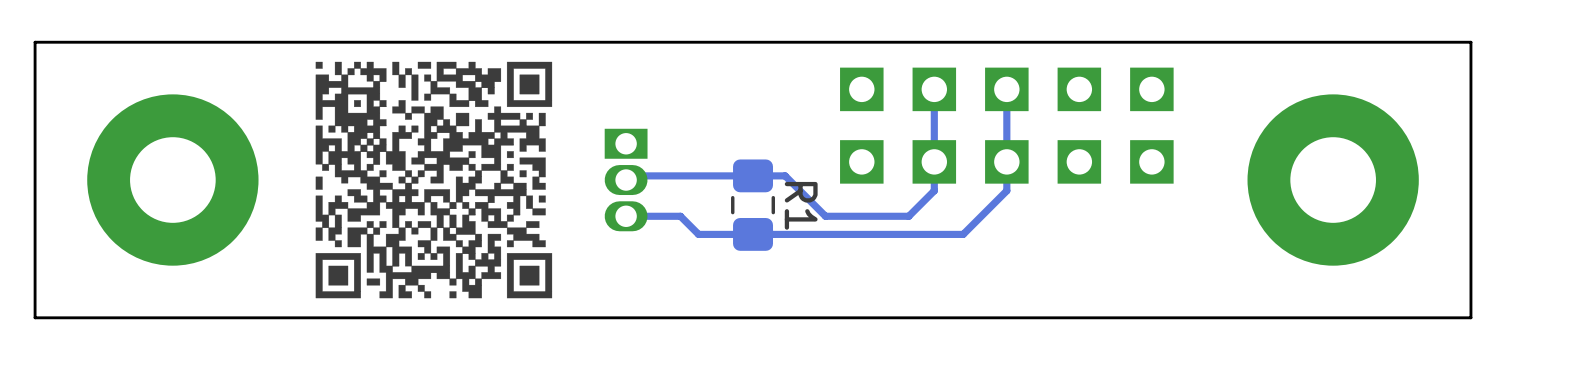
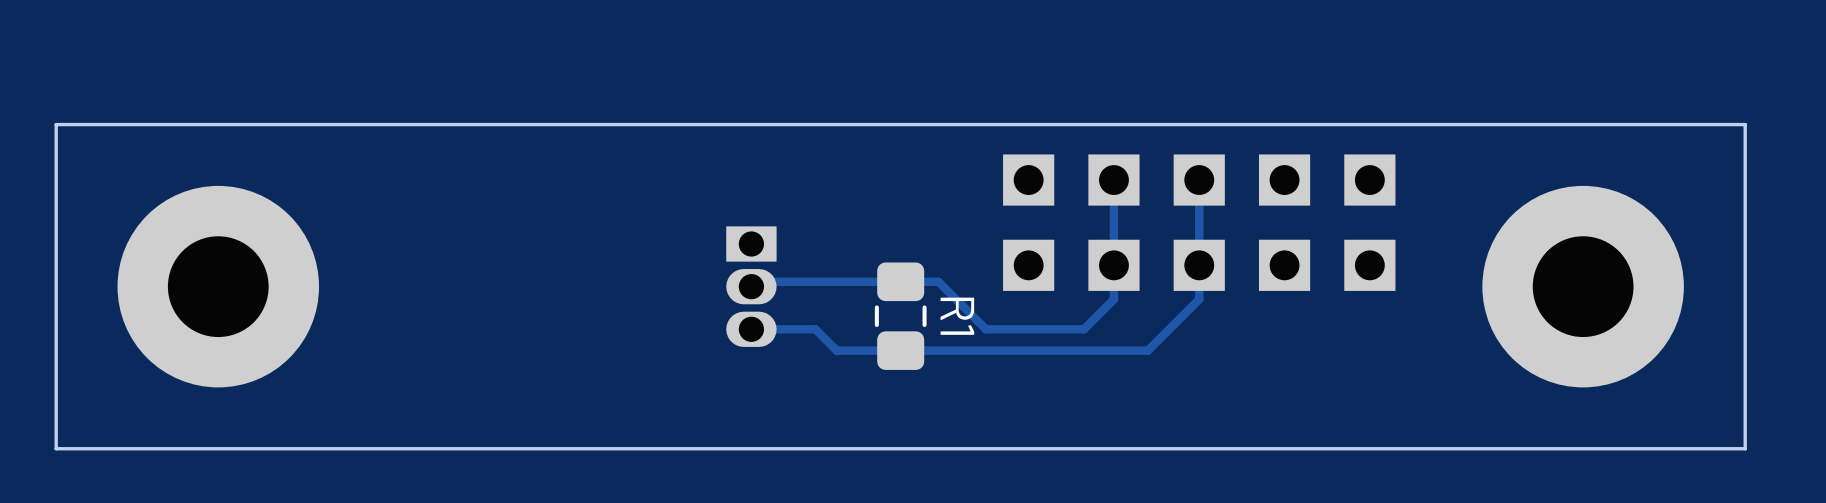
drawing: [315, 61, 553, 299] -> none

